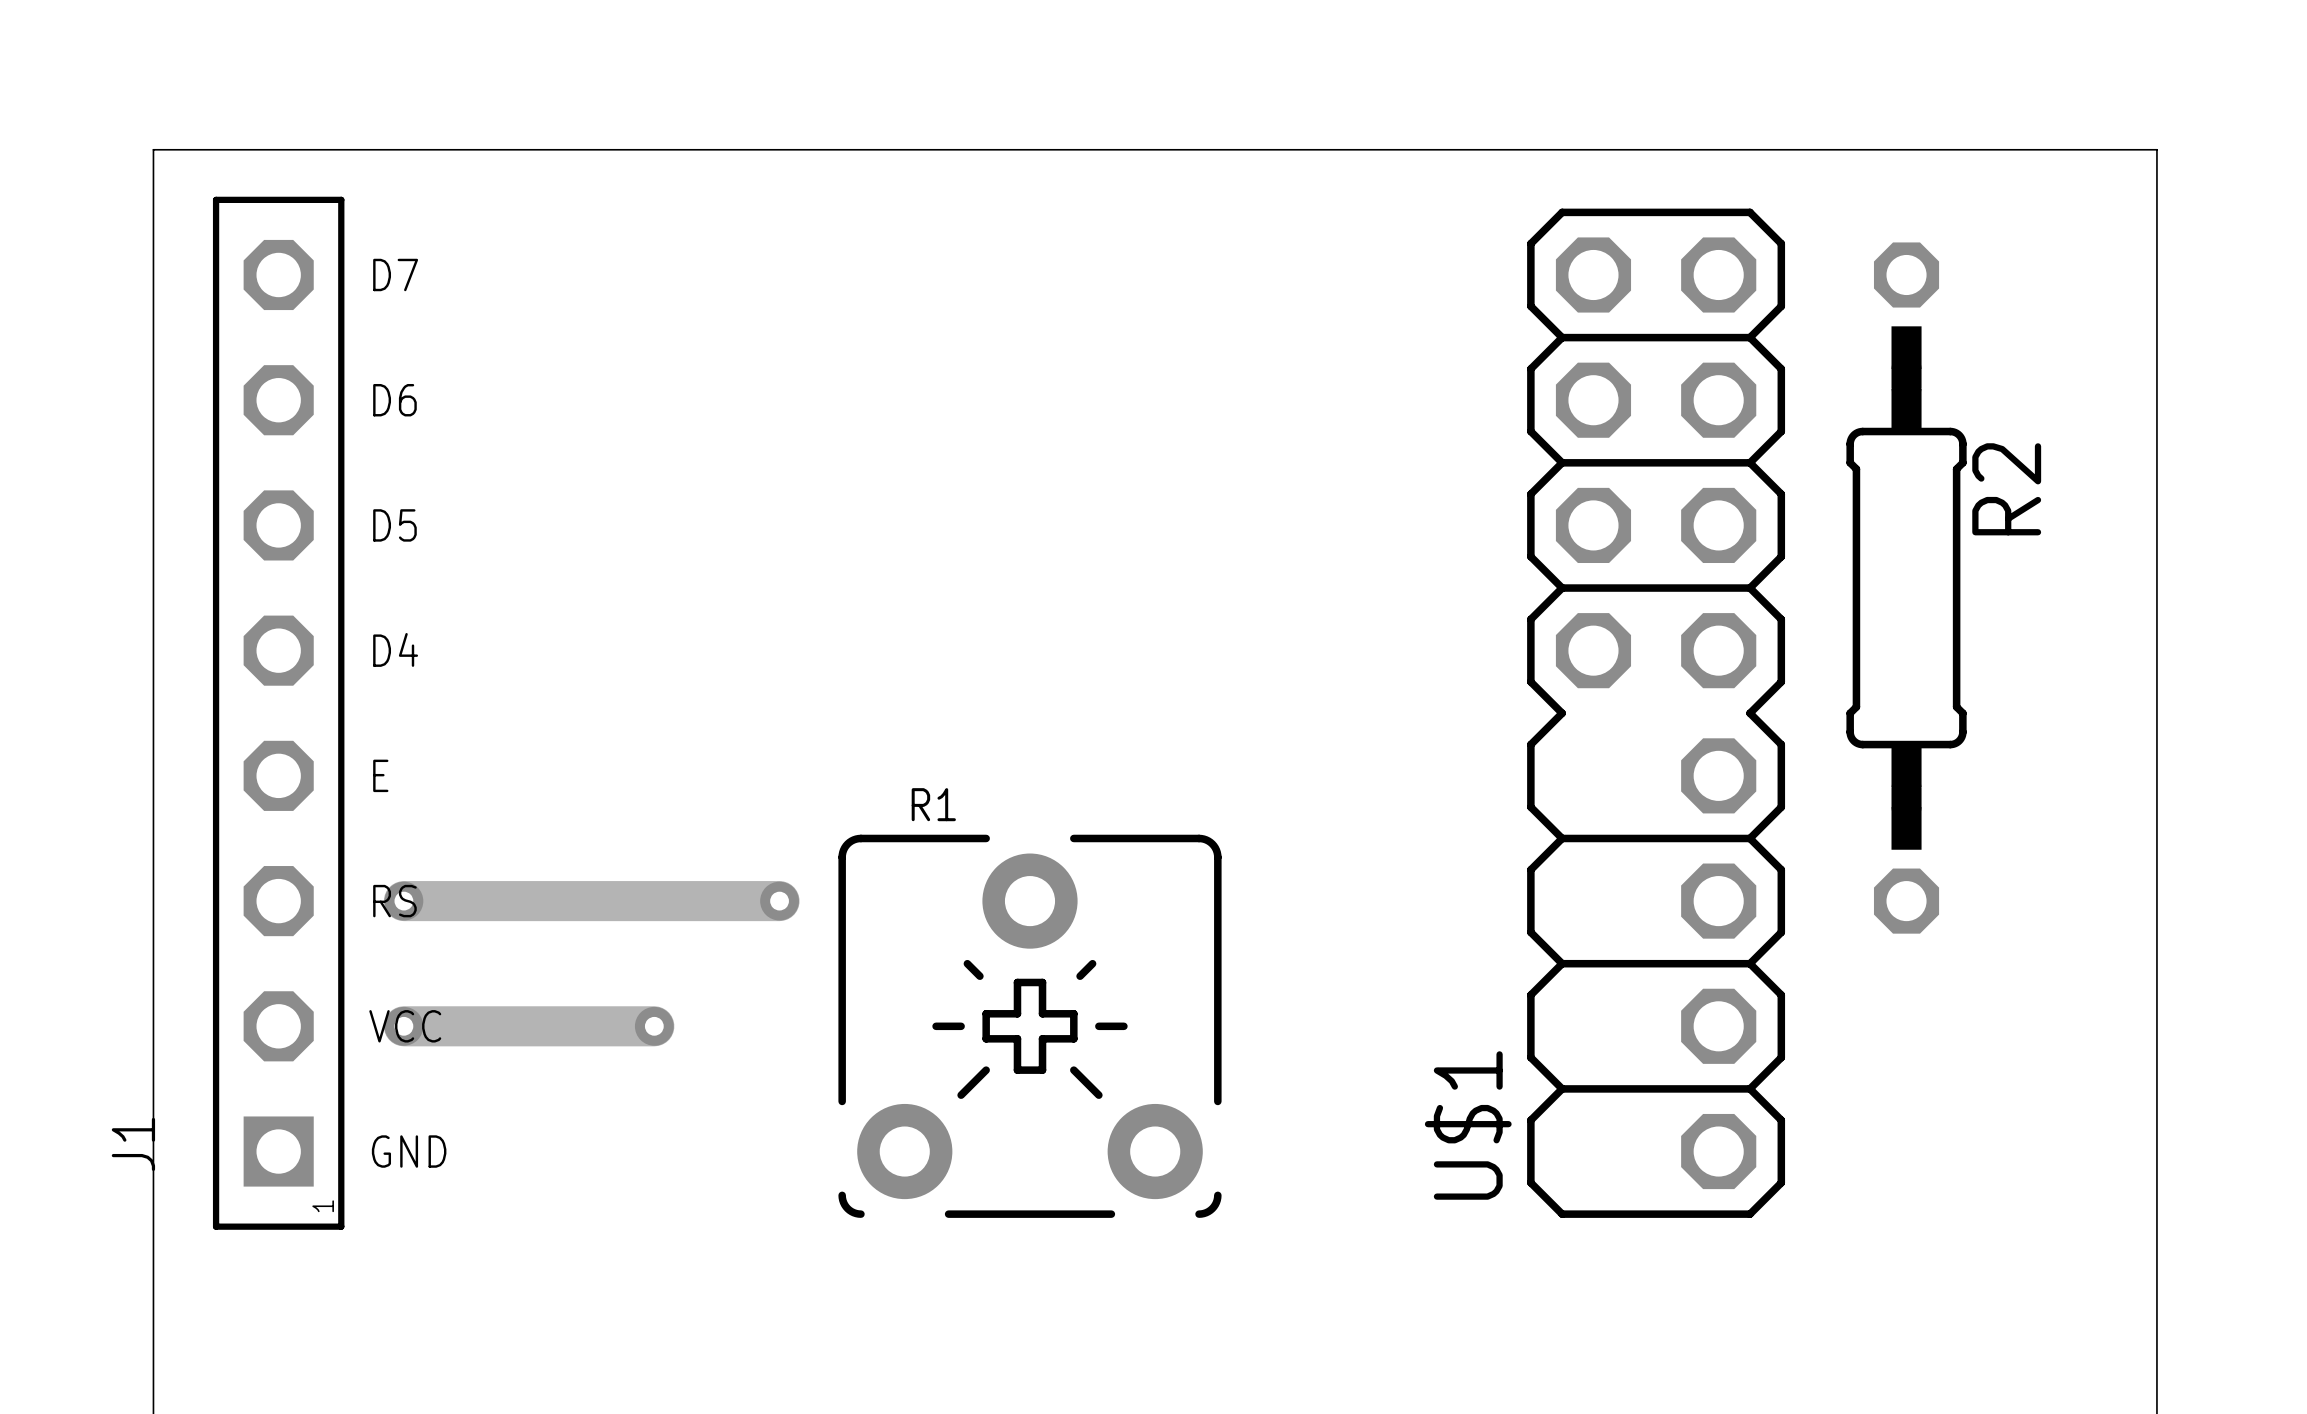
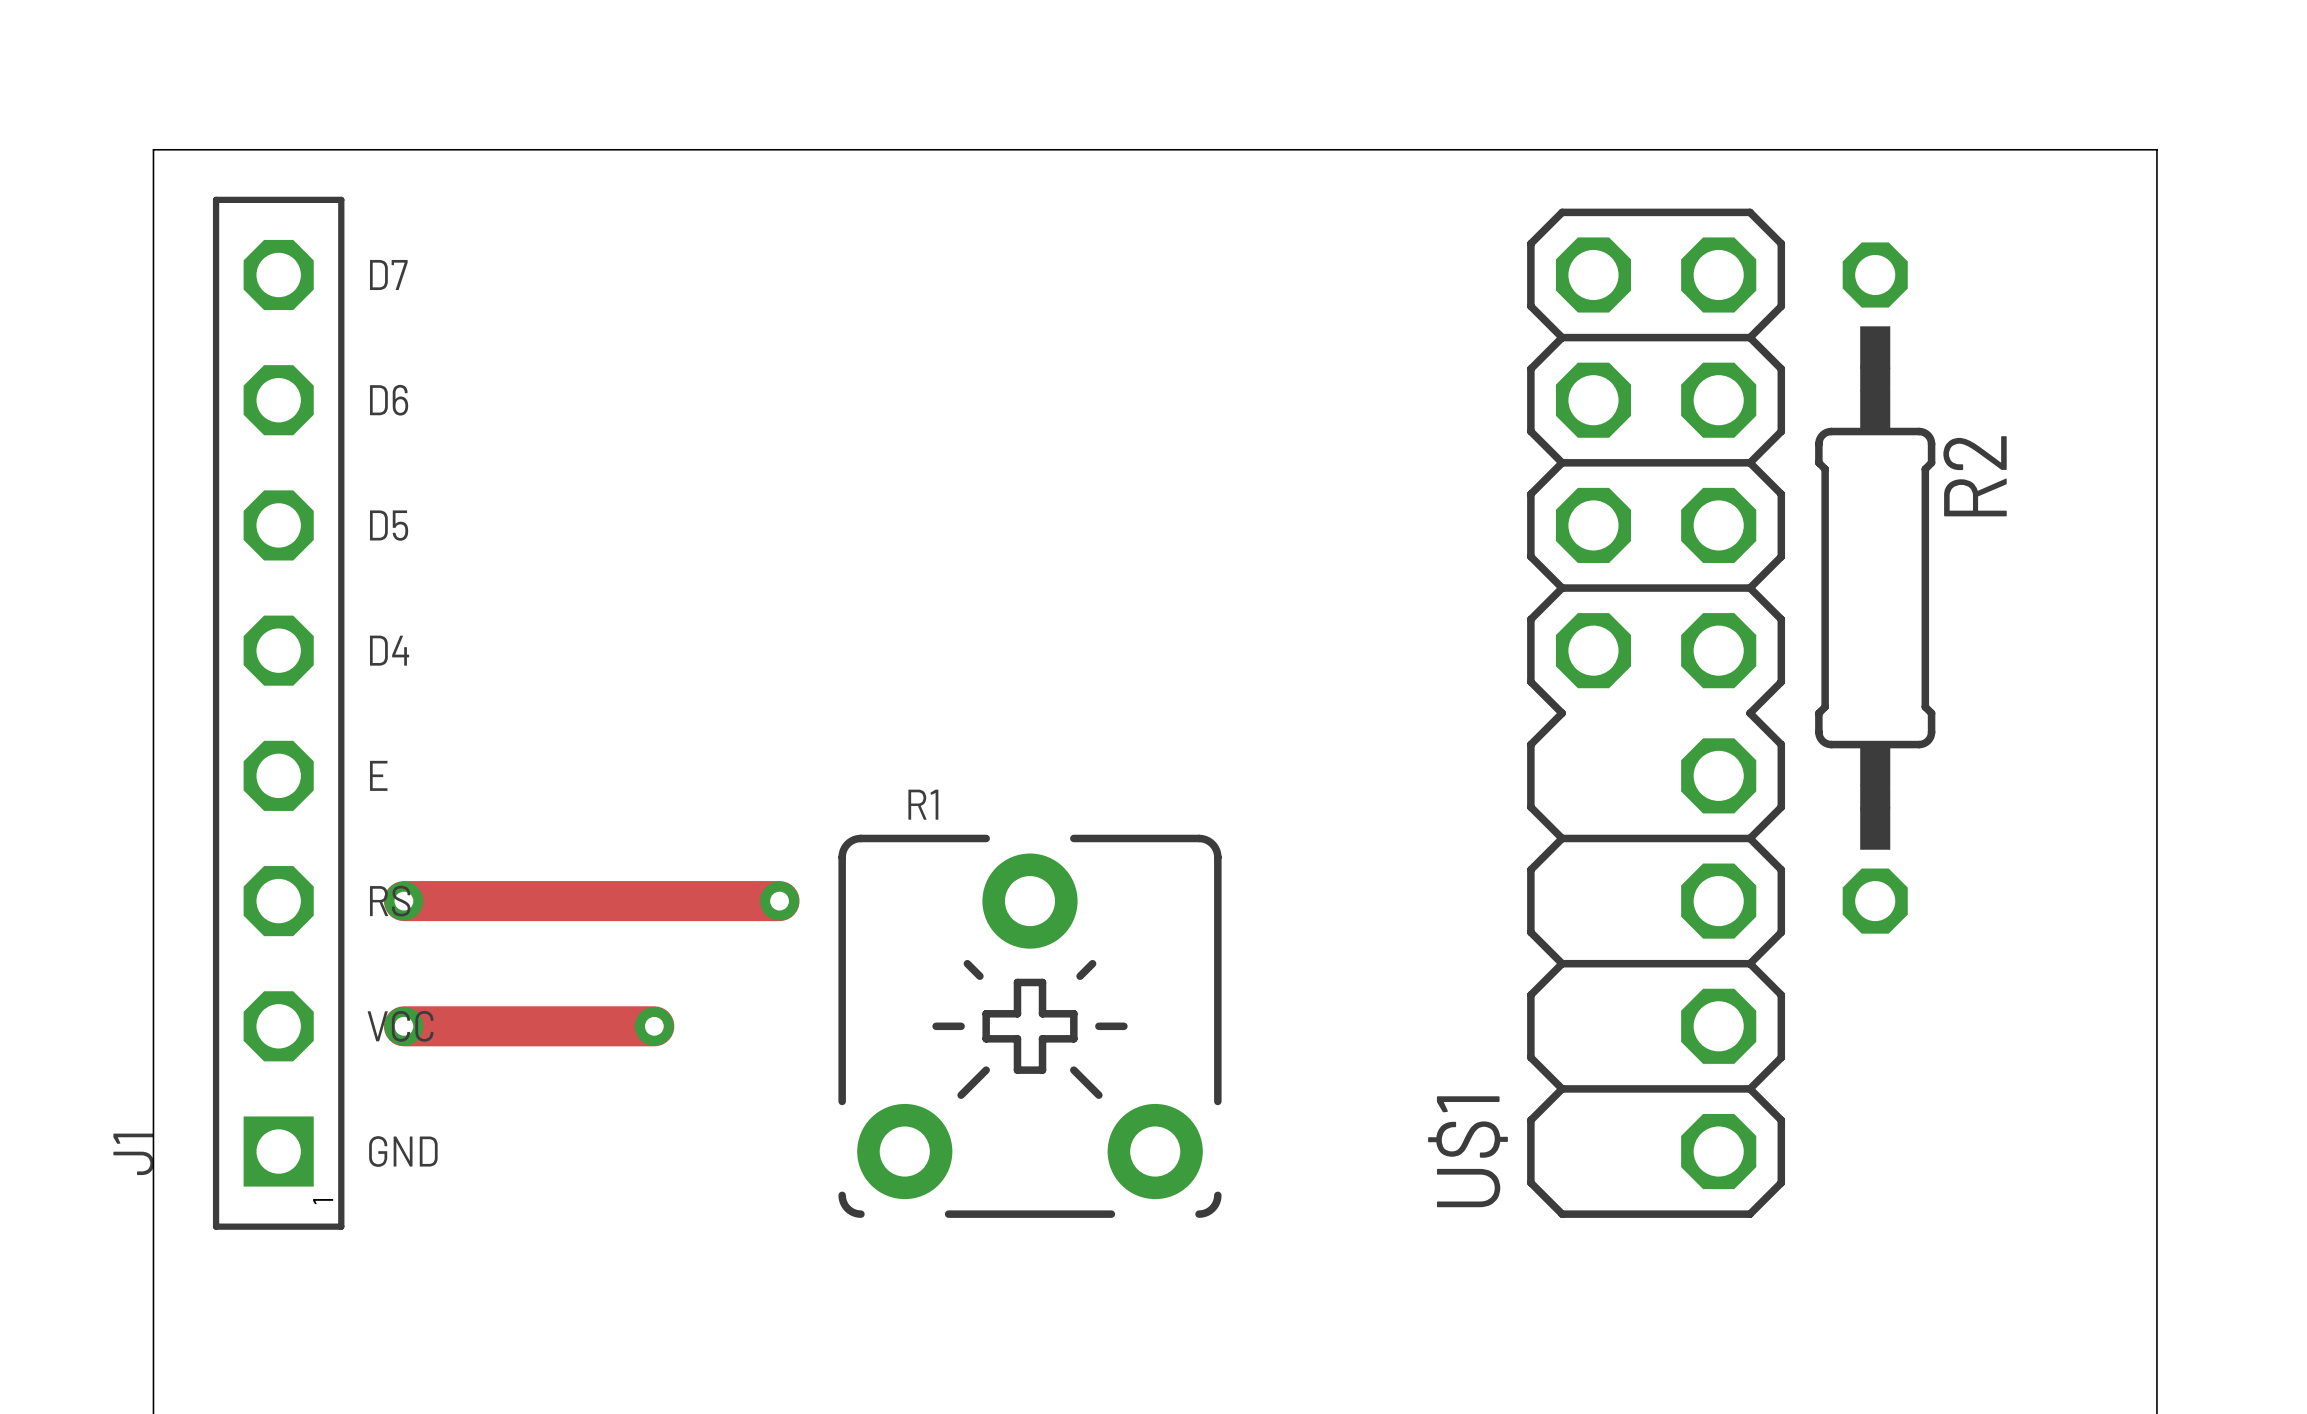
R2 position: (1906, 588) -> (1875, 588)

